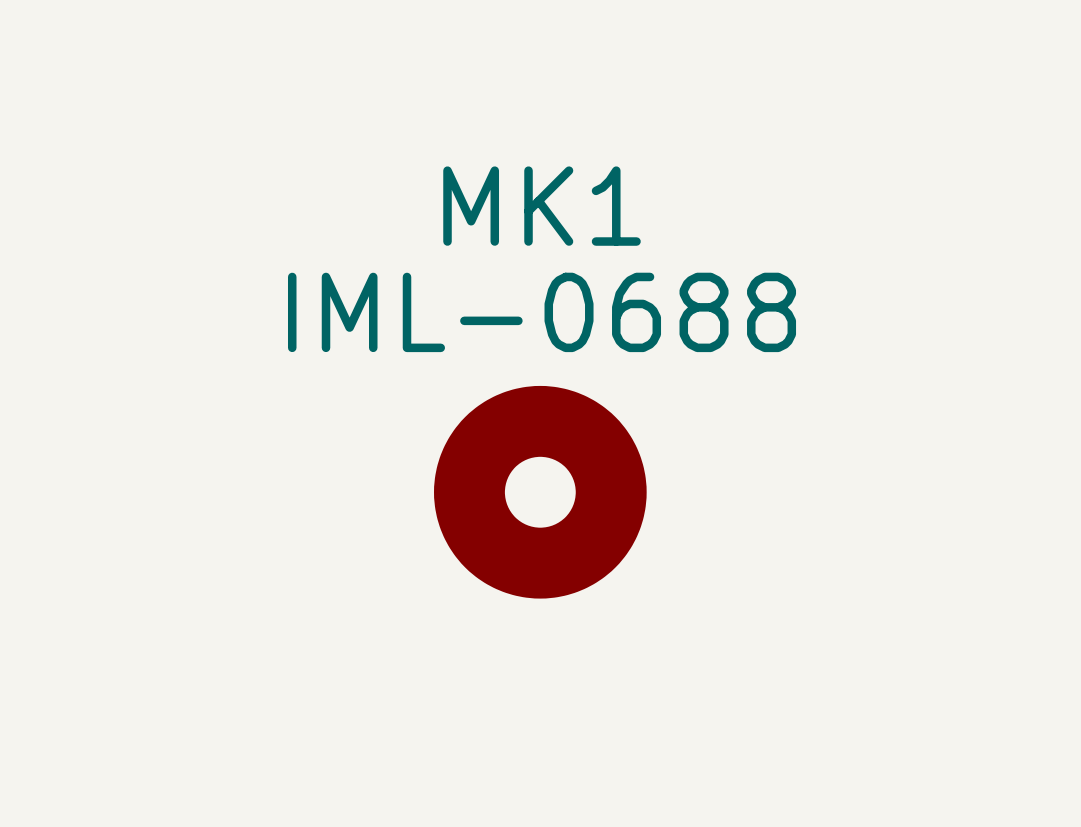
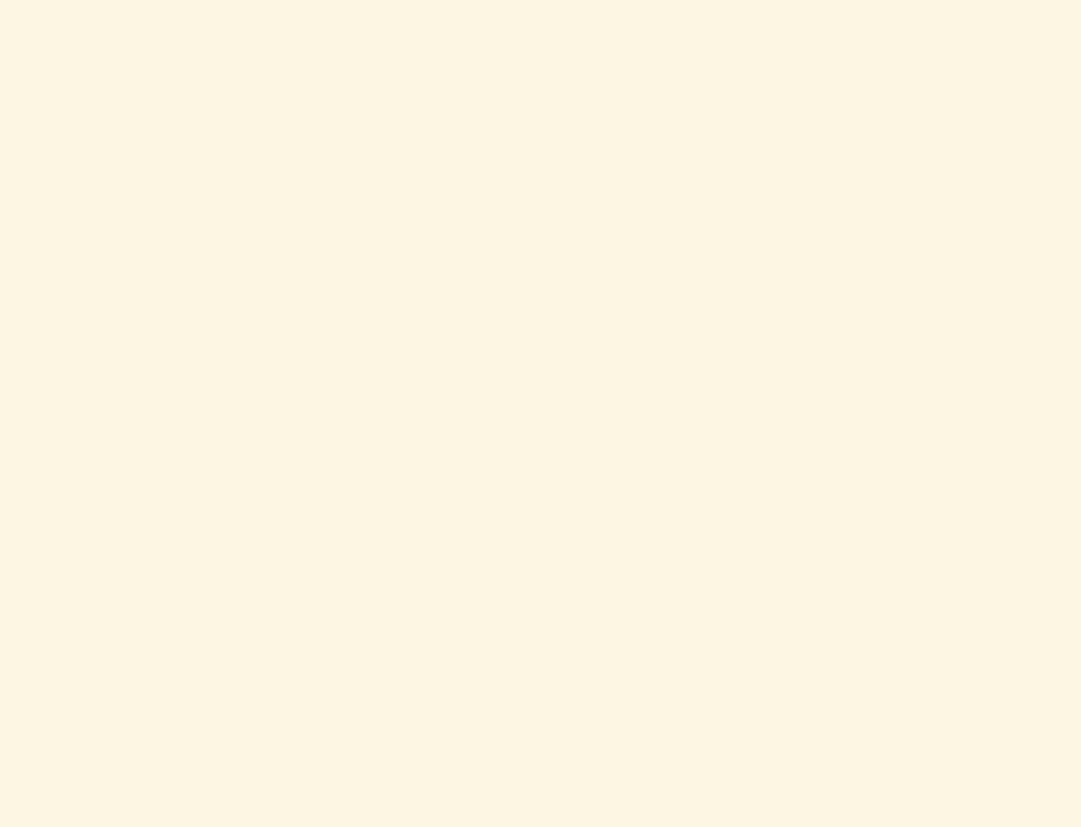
MK1: IML-0688 (540, 492) -> none

